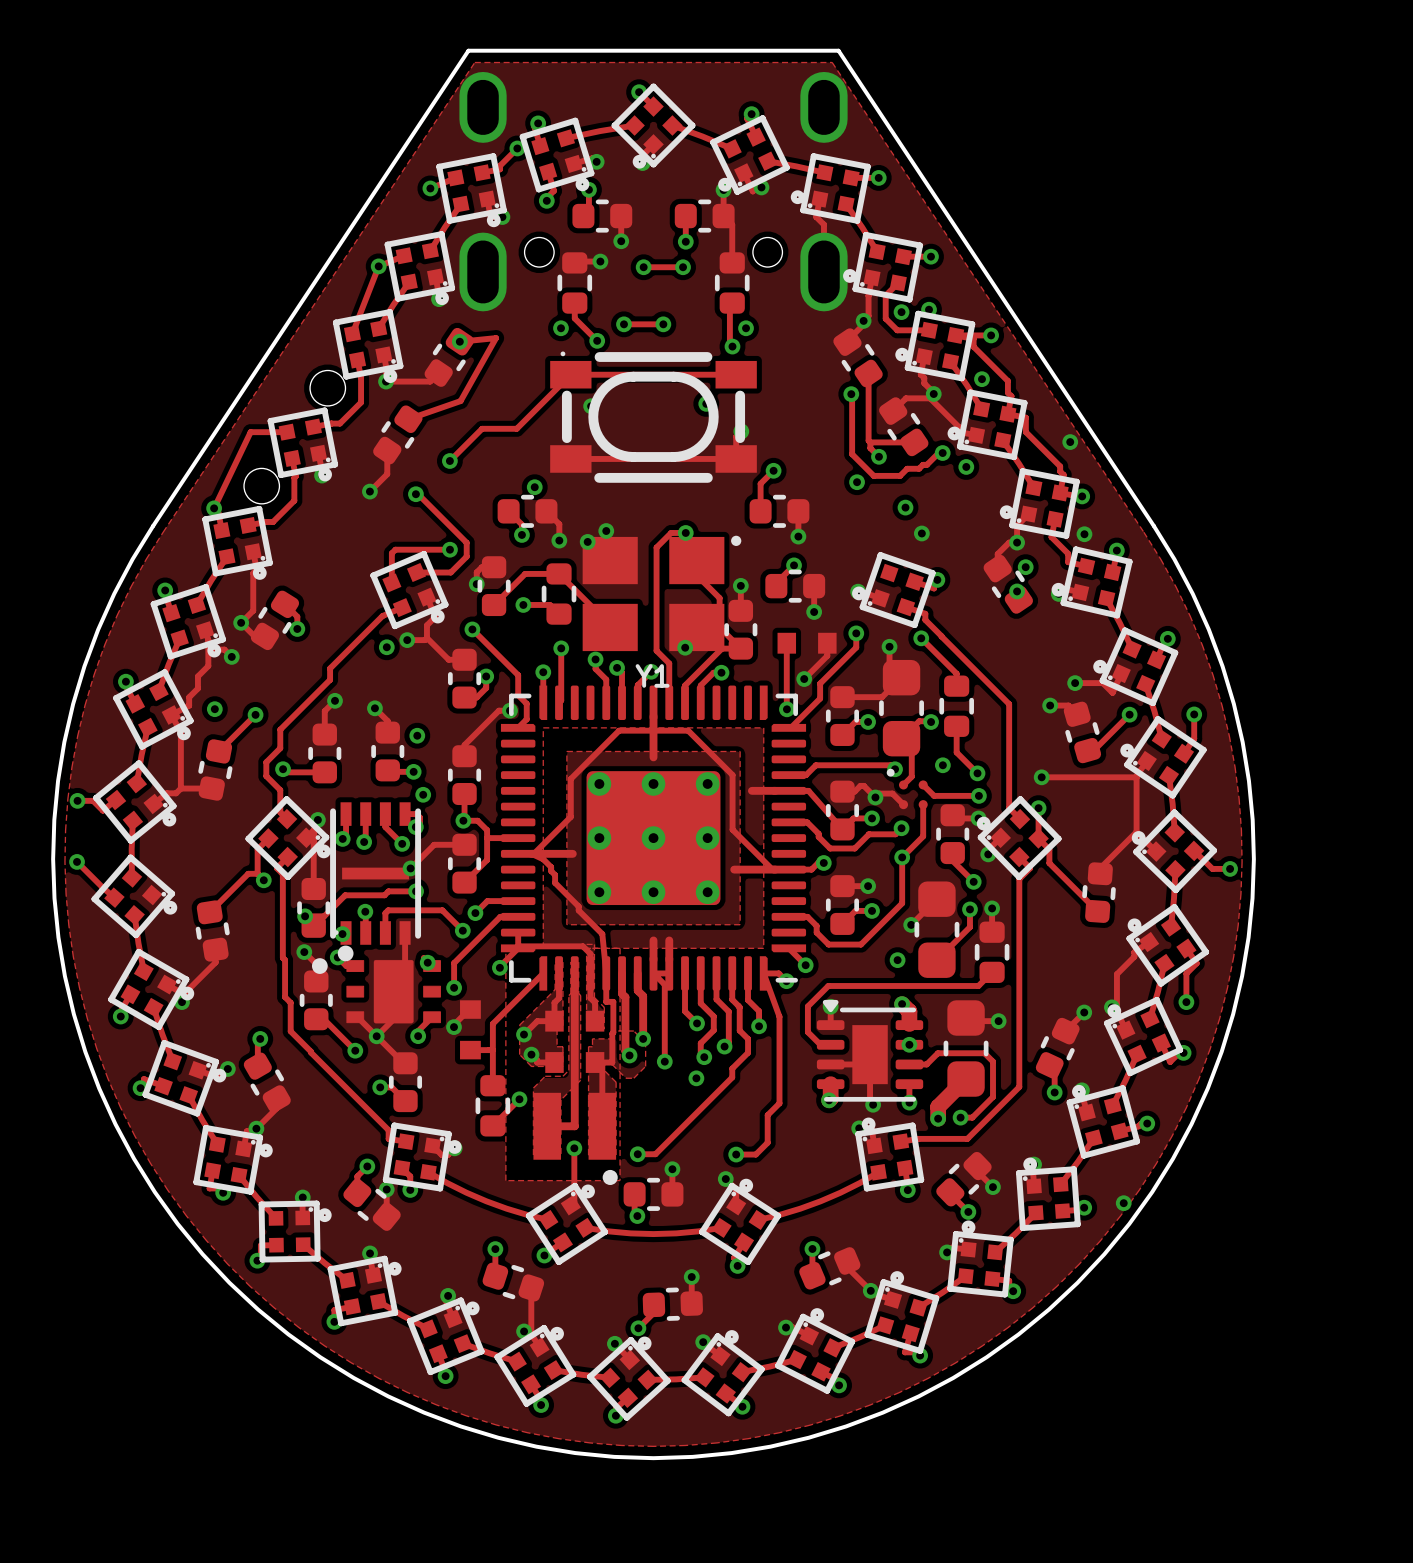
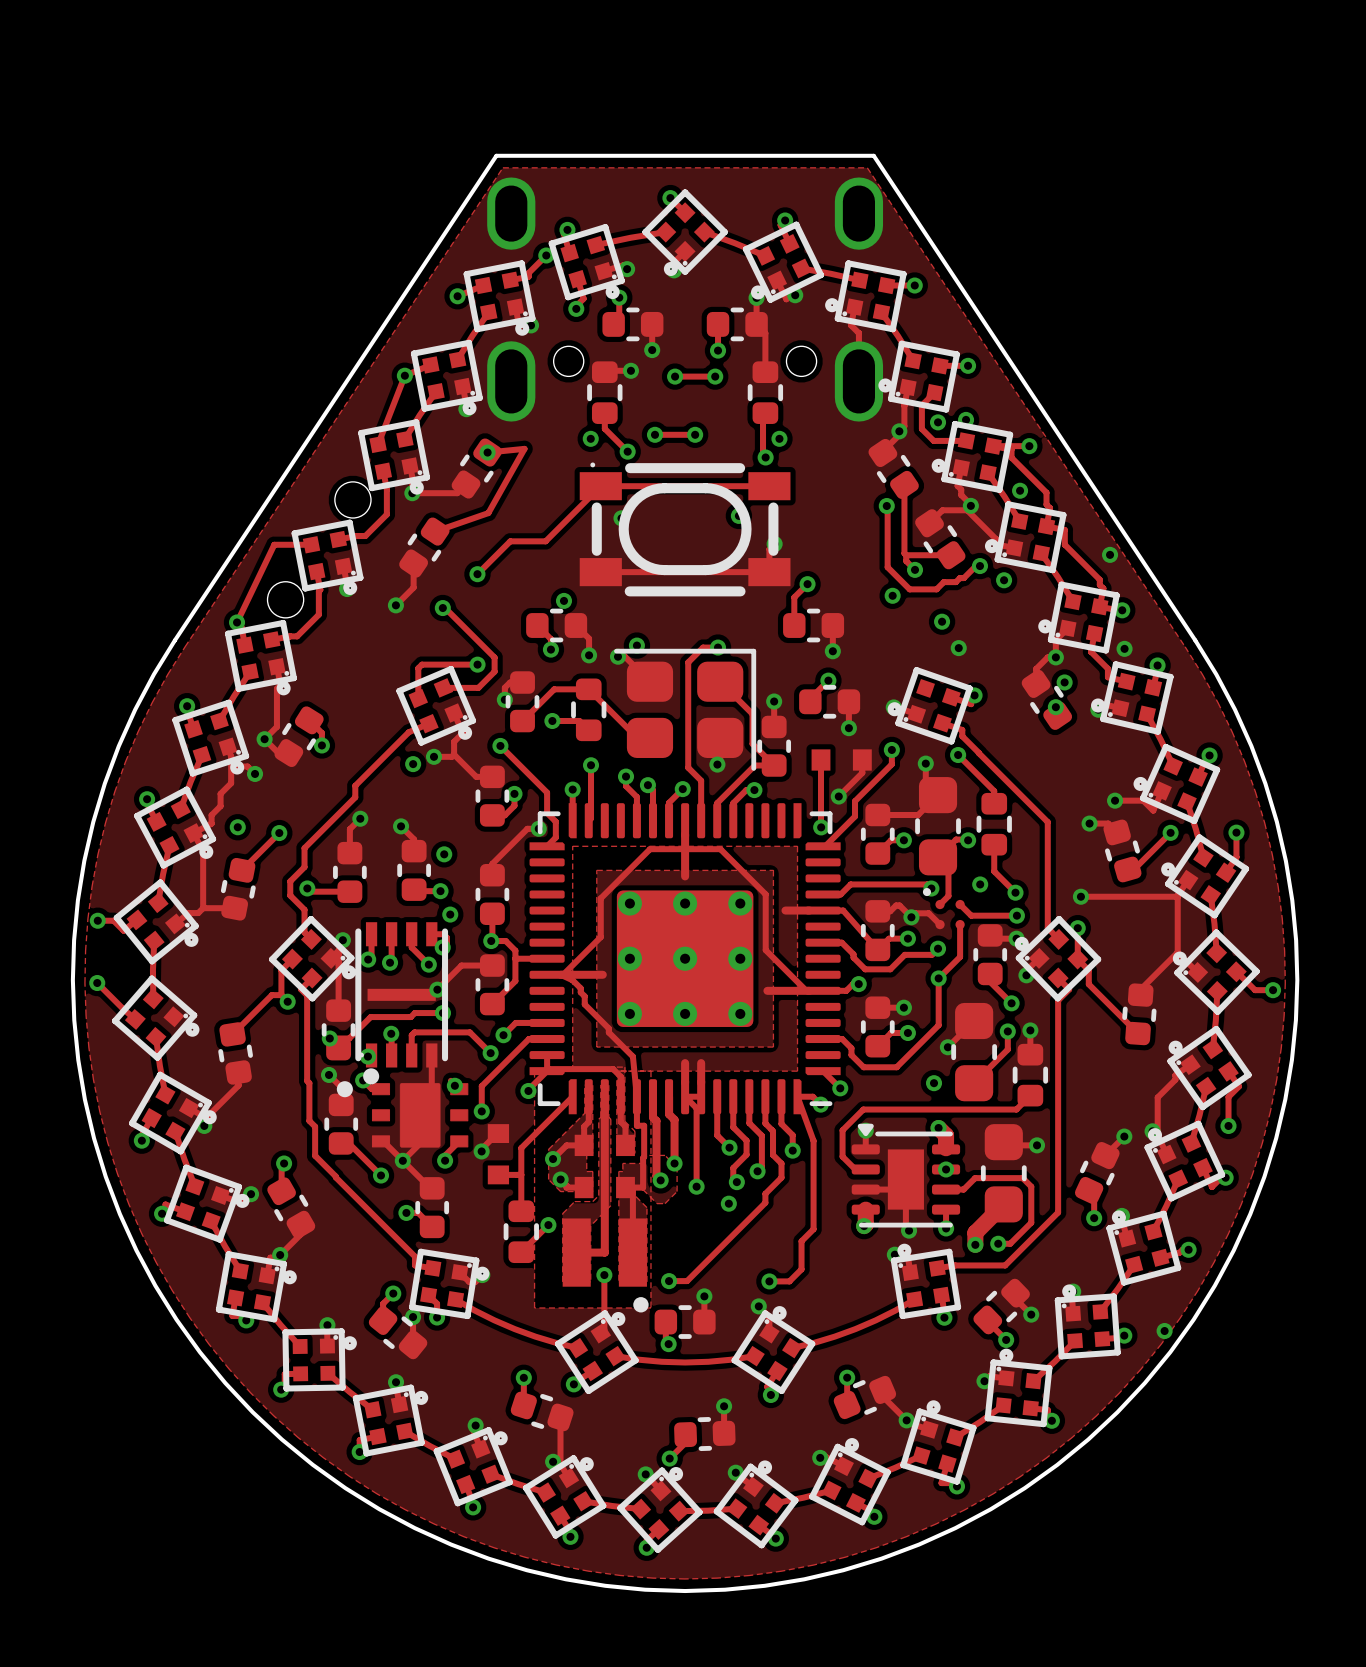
Y1: (661, 593) -> none
part: none -> (685, 709)

